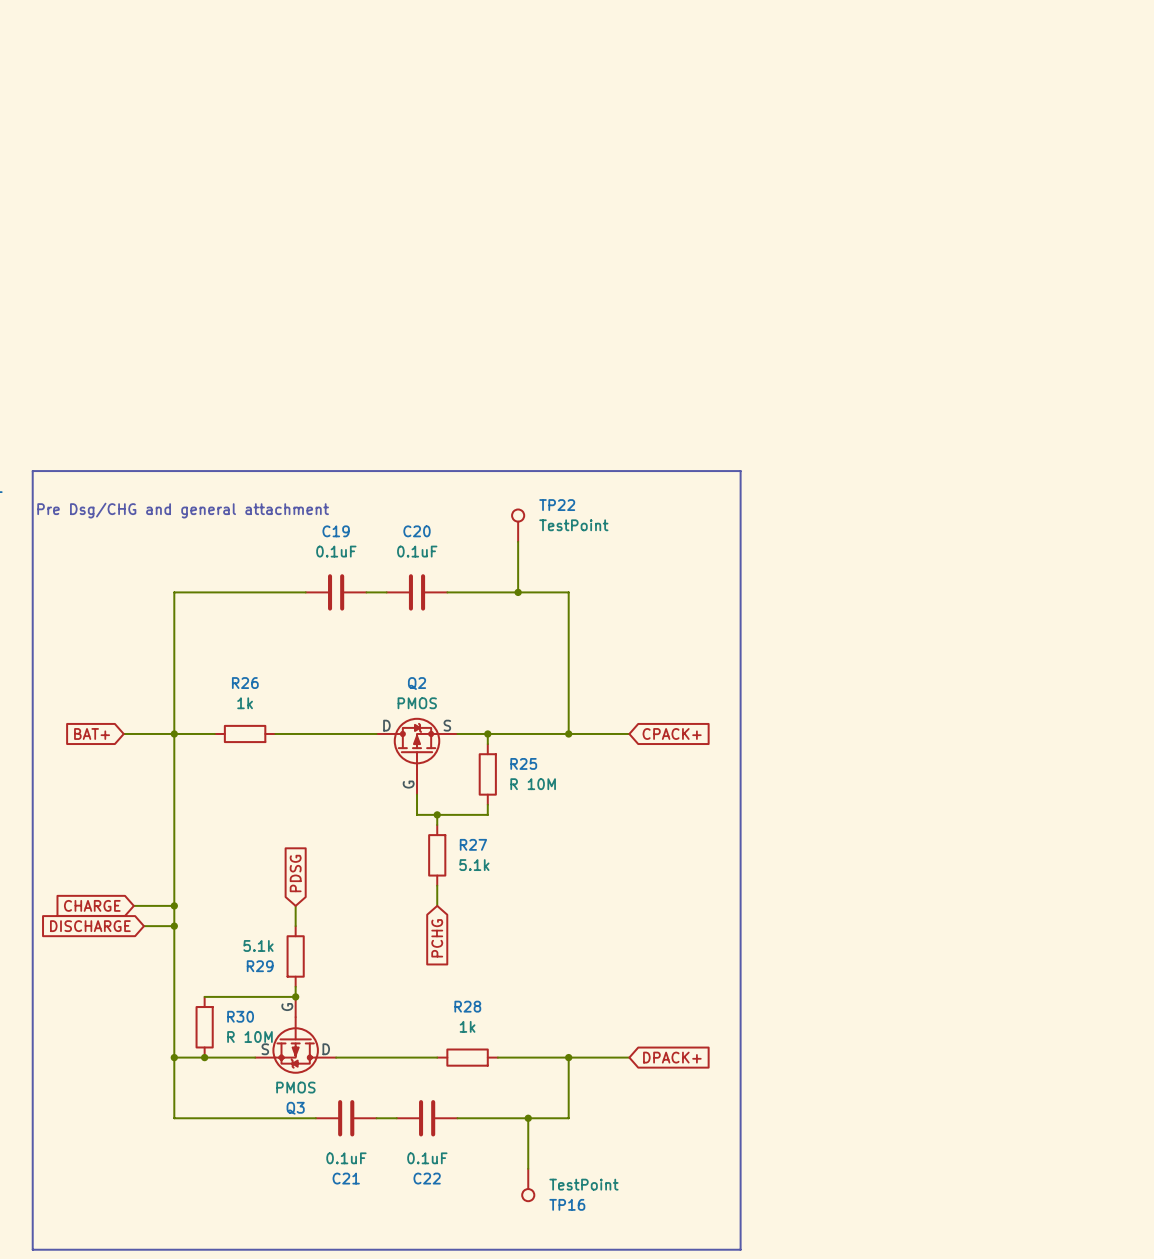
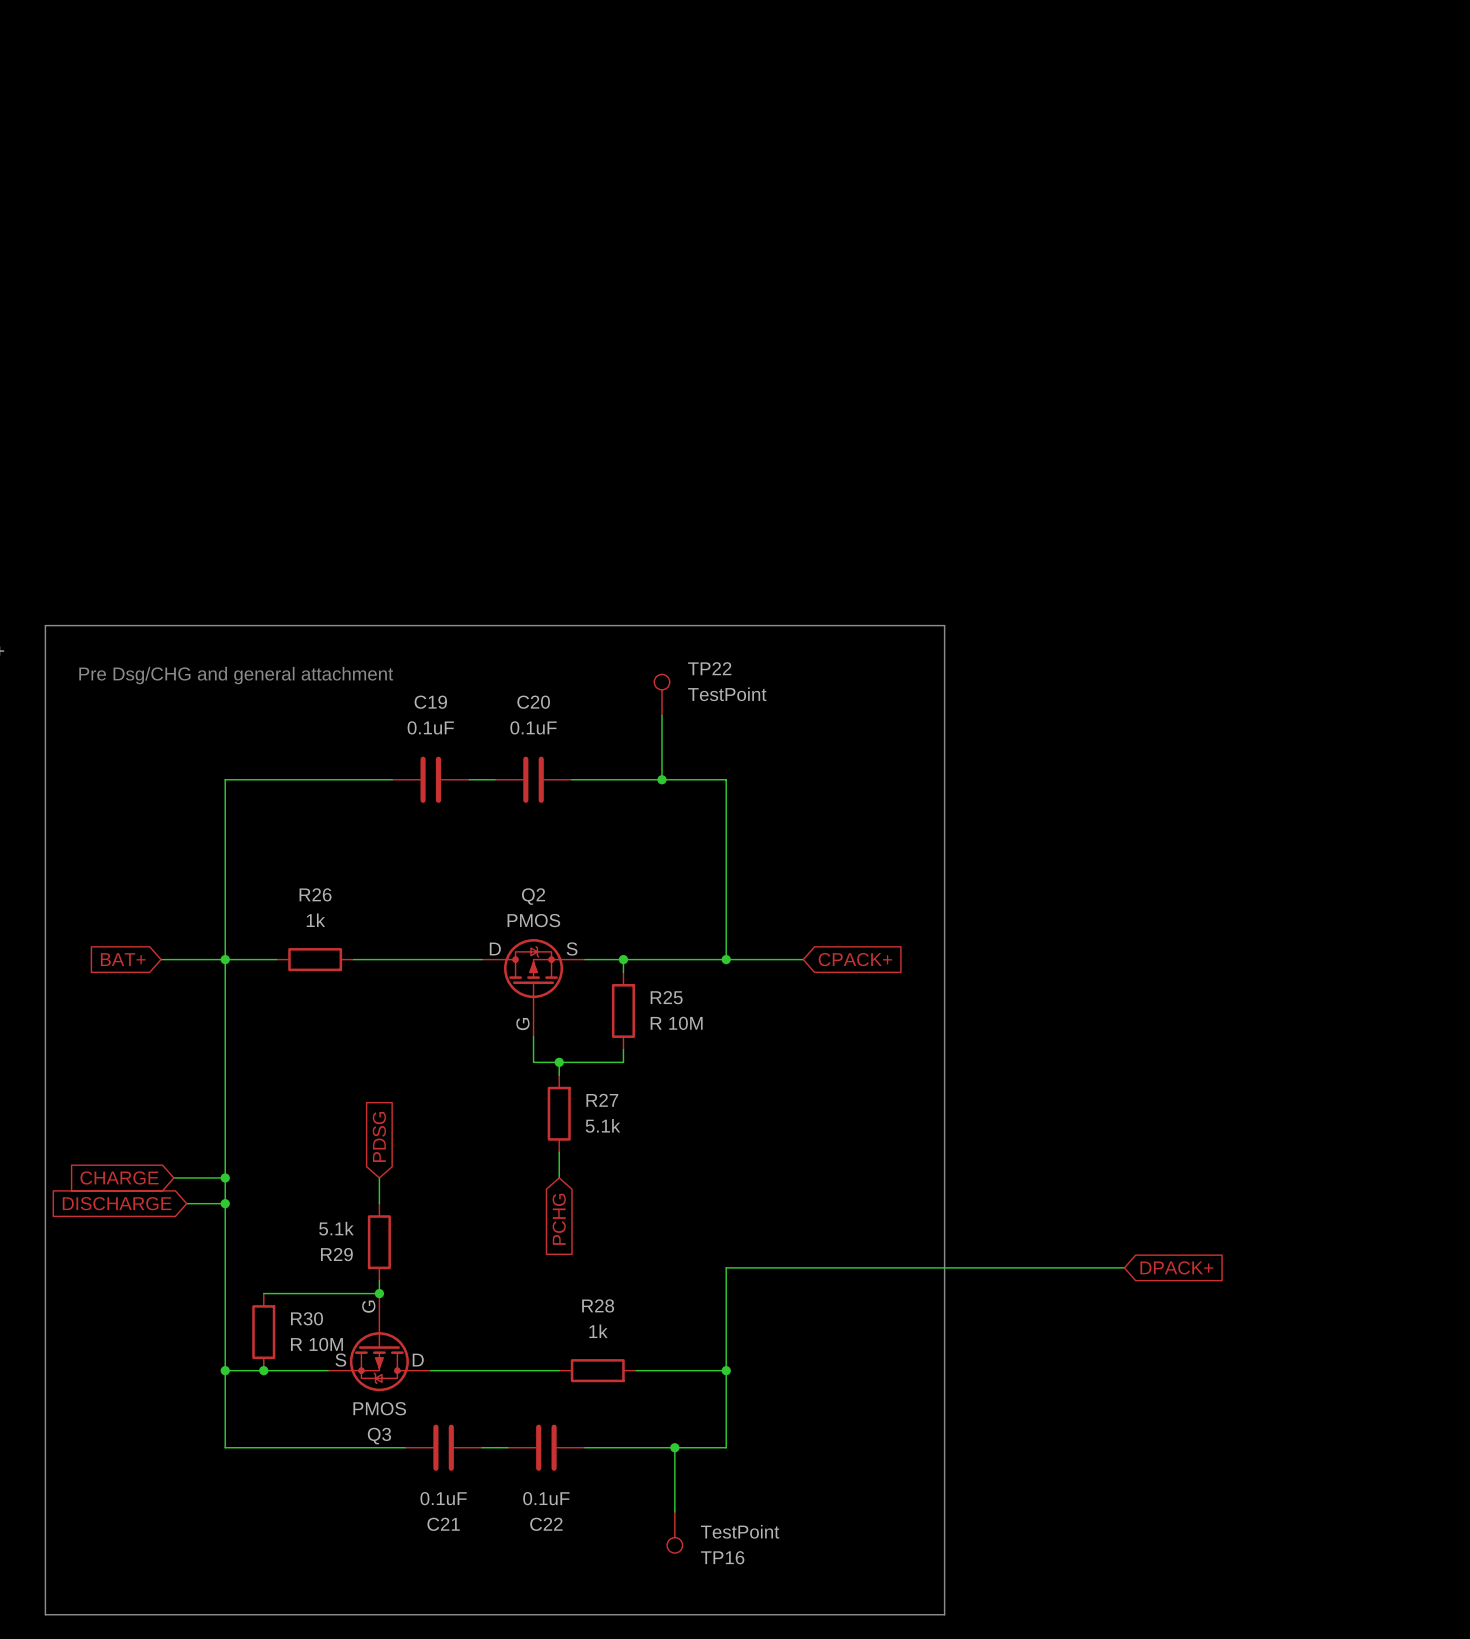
global label: none -> DPACK+ (1176, 1267)
wire: (568, 1057) (629, 1057) -> (726, 1370) (726, 1267) (1124, 1267)
global label: DPACK+ (672, 1057) -> none

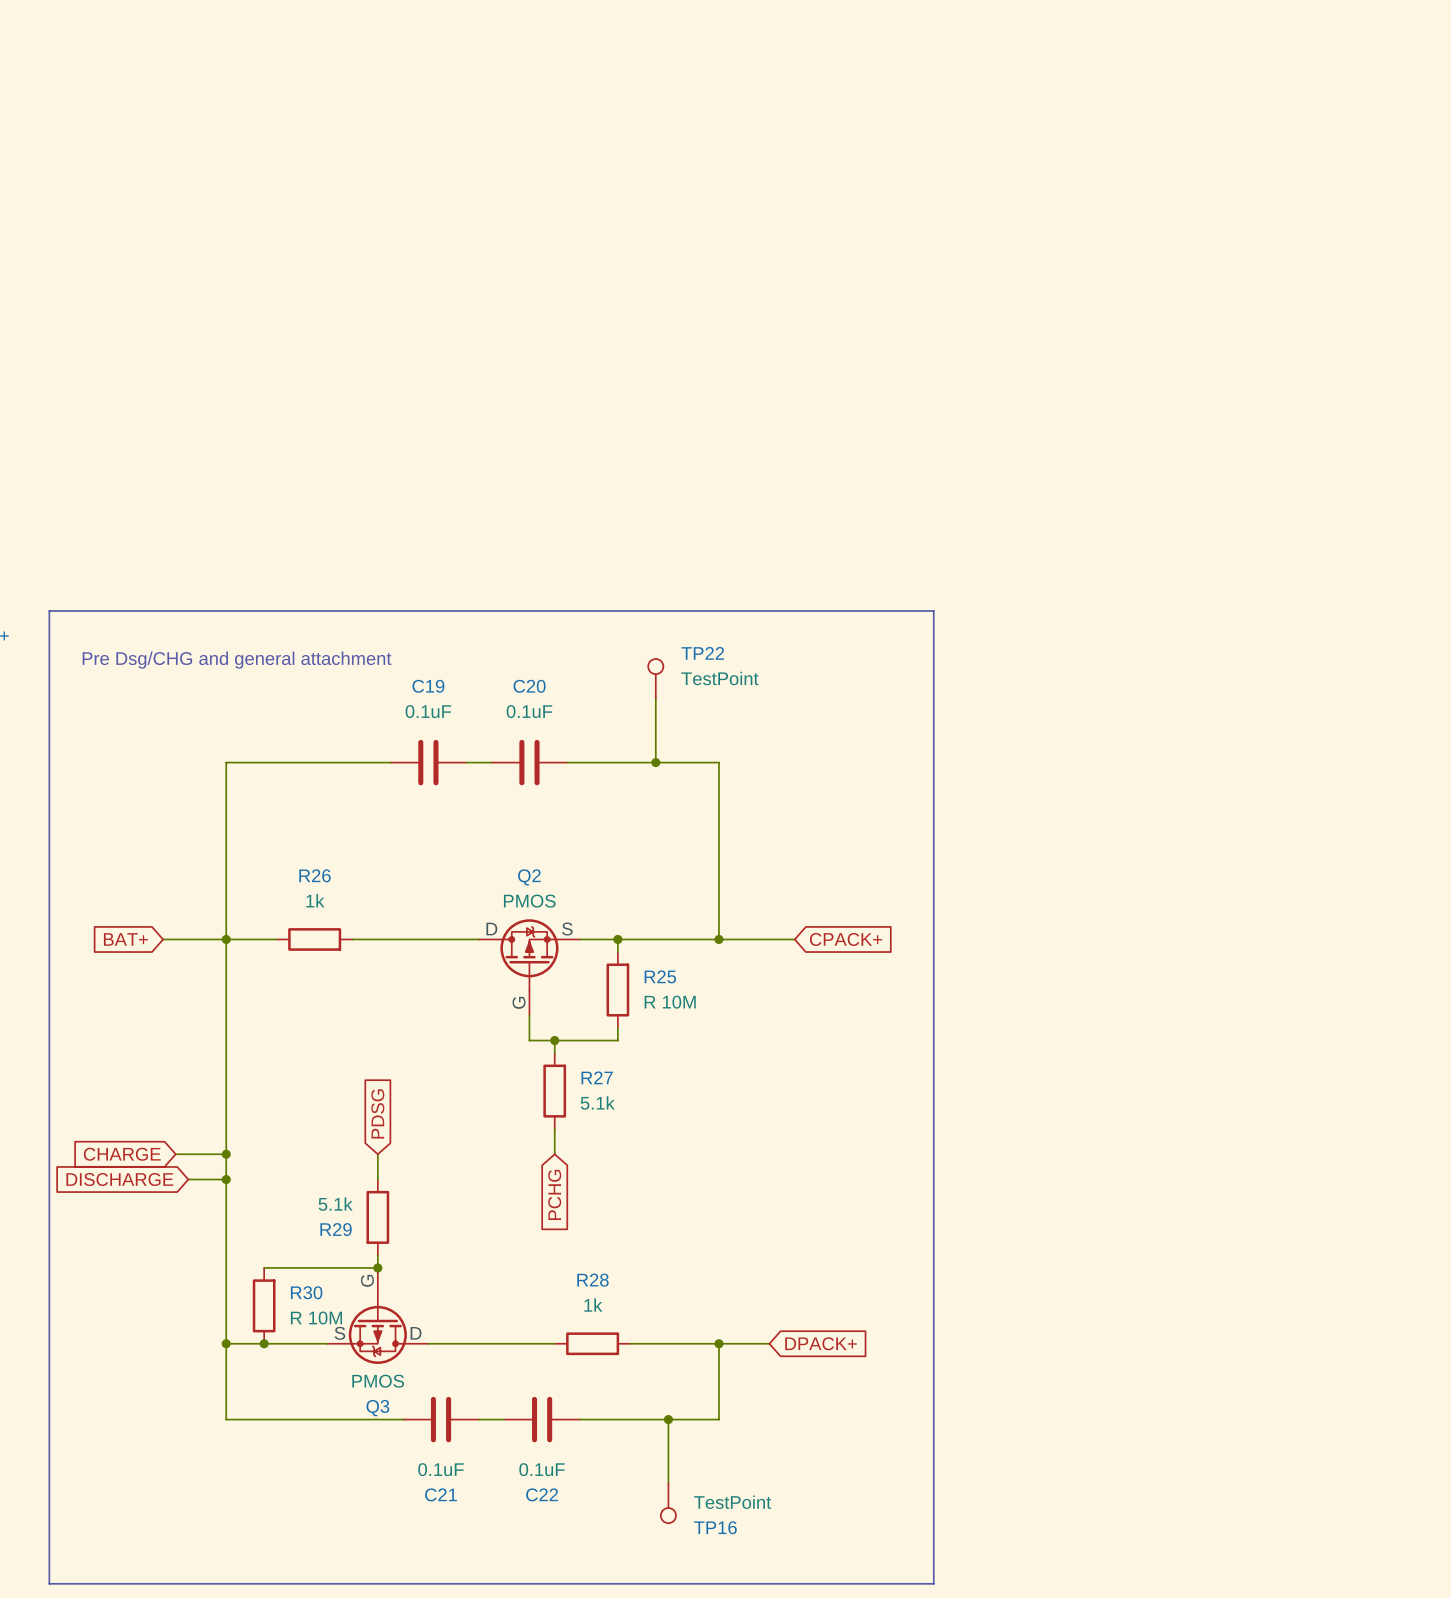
wire: (1124, 1267) (726, 1267) (726, 1370) -> (769, 1343) (718, 1343)
global label: DPACK+ (1176, 1267) -> none
global label: none -> DPACK+ (821, 1343)

